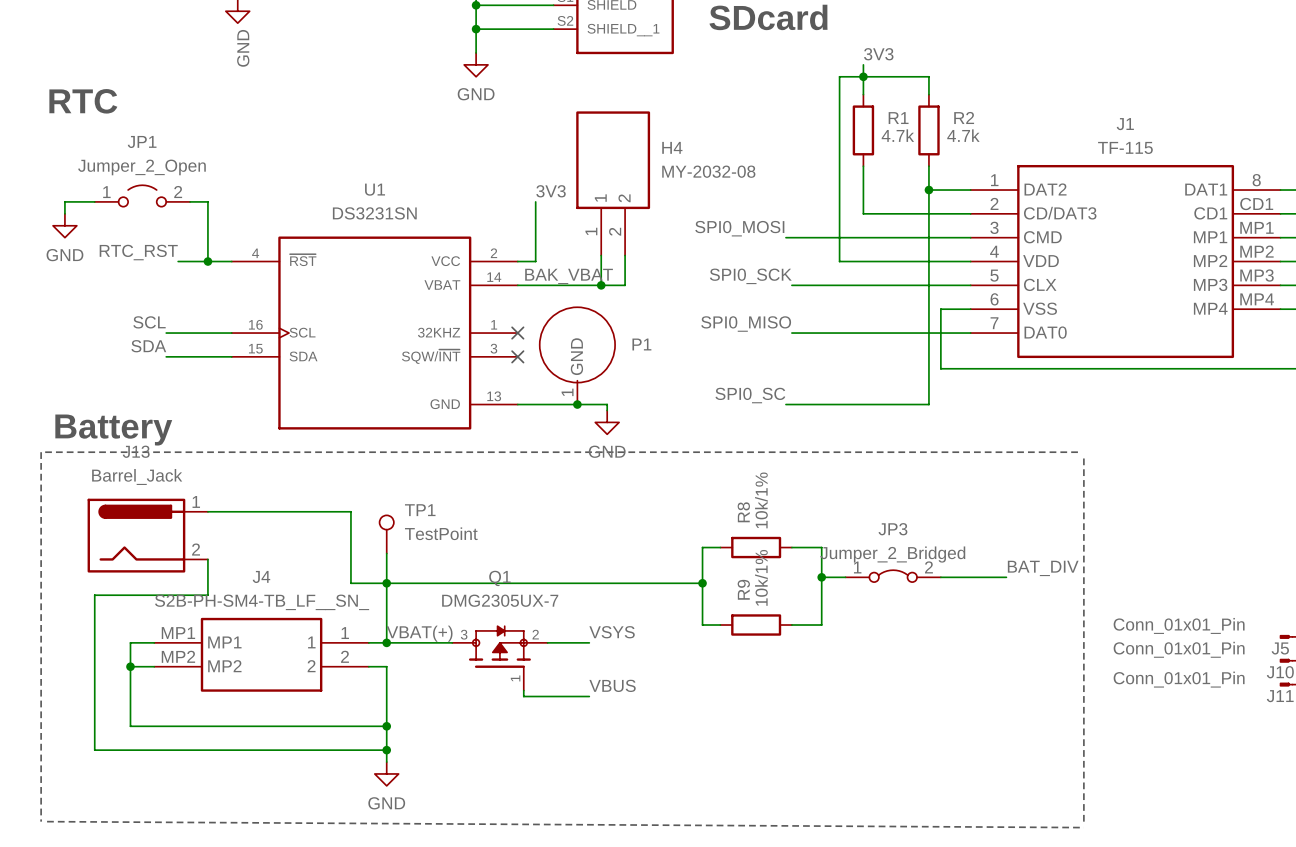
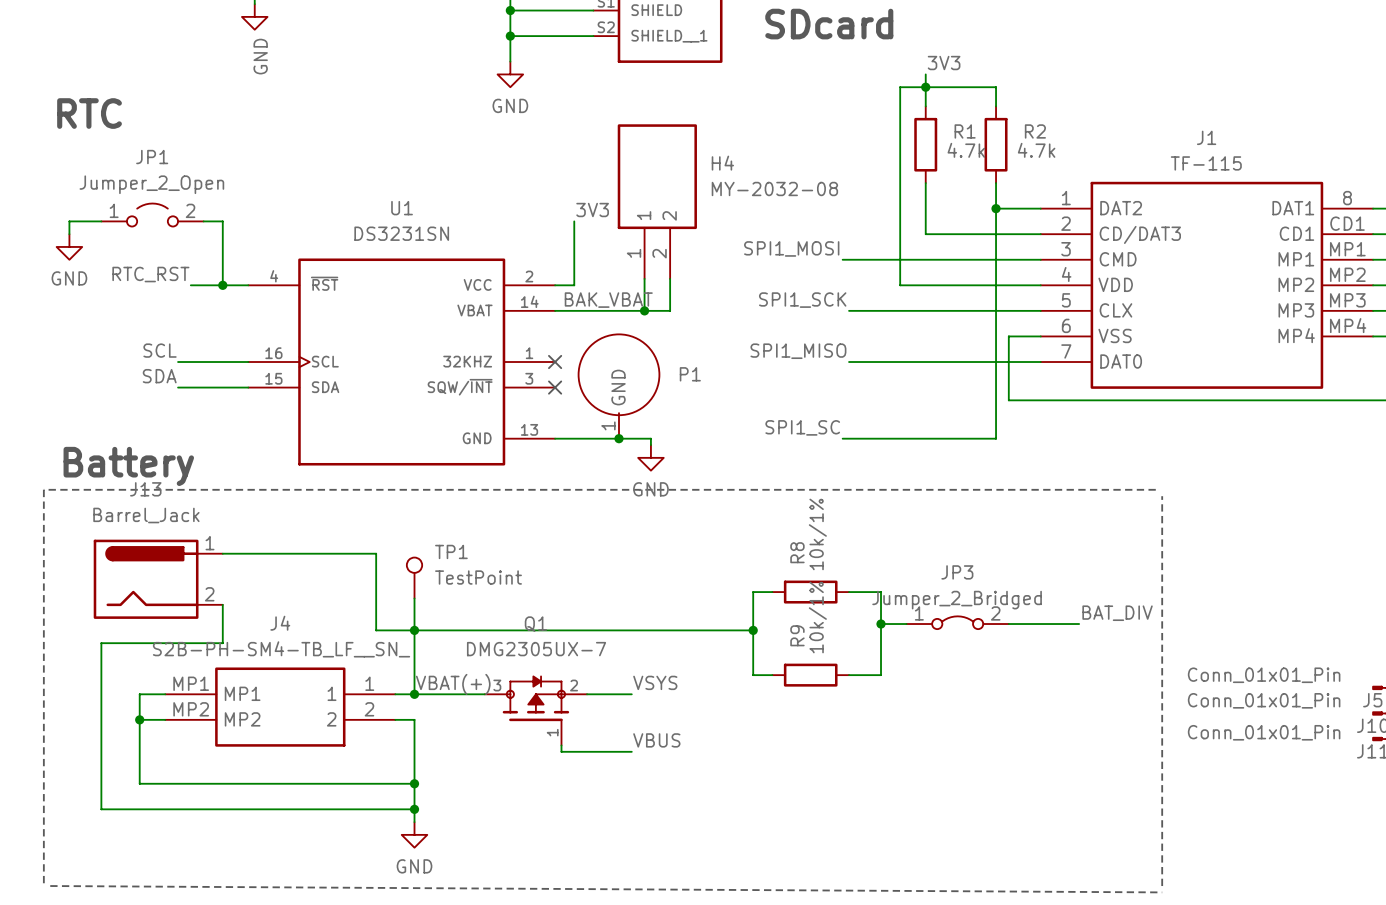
label: SPI0_MOSI (739, 228) -> SPI1_MOSI (791, 248)
label: SPI0_SCK (750, 276) -> SPI1_SCK (802, 300)
label: SPI0_MISO (746, 324) -> SPI1_MISO (798, 351)
label: SPI0_SC (750, 395) -> SPI1_SC (802, 427)

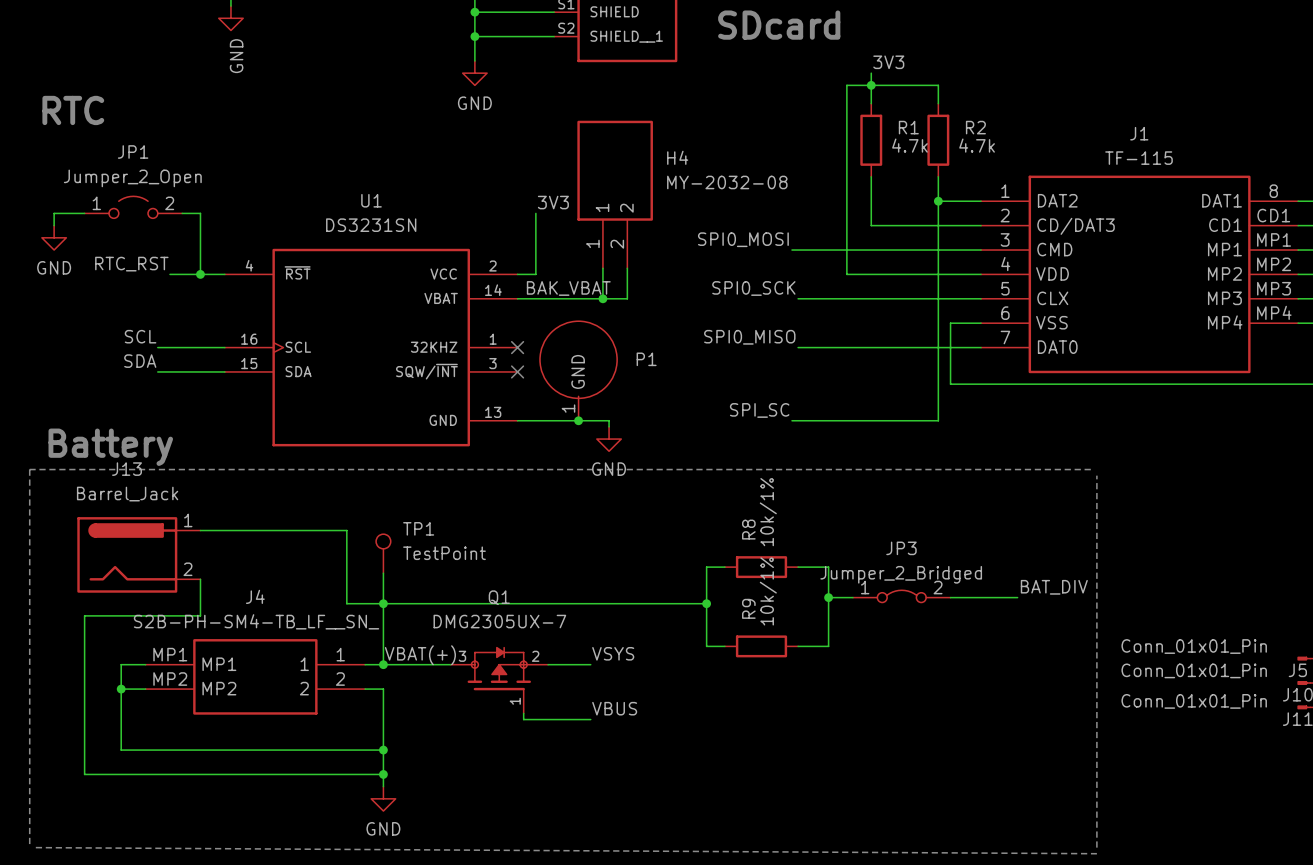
label: SPI1_MOSI (791, 248) -> SPI0_MOSI (743, 239)
label: SPI1_SCK (802, 300) -> SPI0_SCK (753, 288)
label: SPI1_MISO (798, 351) -> SPI0_MISO (749, 337)
label: SPI1_SC (802, 427) -> SPI_SC (759, 410)

